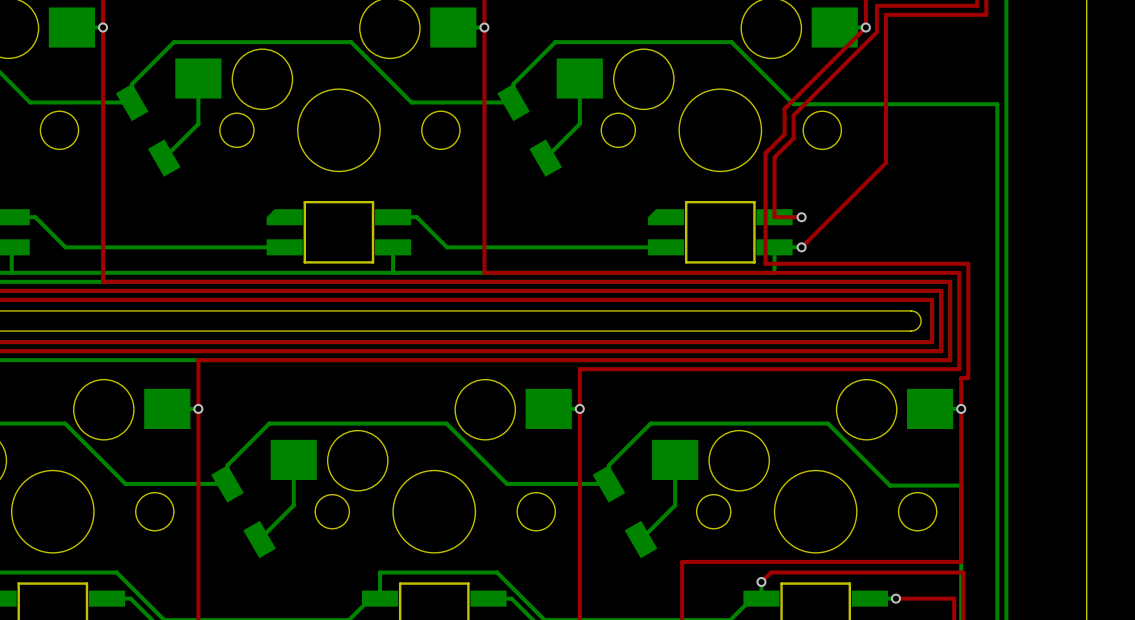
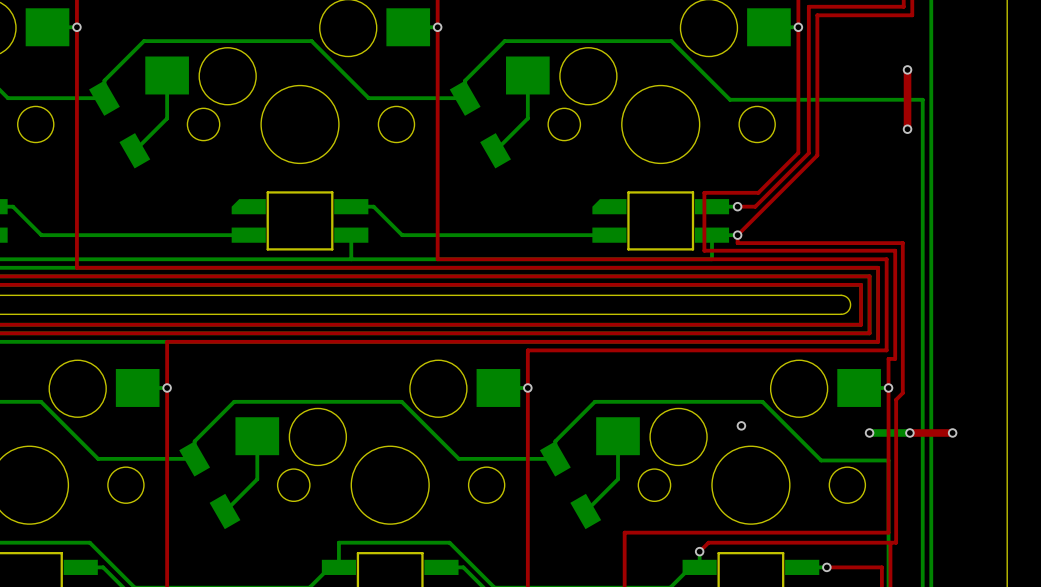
top track: (865, 27) (784, 108) (784, 134) (765, 153) (766, 263) -> (798, 27) (798, 152) (758, 192) (704, 192) (704, 250)
top track: (876, 32) (793, 115) (793, 138) (774, 157) (774, 217) (801, 217) -> (808, 31) (808, 153) (755, 206) (737, 206)
top track: none -> (907, 69) (907, 129)
via: none -> (907, 69)
via: none -> (907, 129)
top track: none -> (737, 235) (737, 243) (902, 243) (902, 393) (896, 399) (896, 542) (890, 542)
via: none -> (741, 425)
bottom track: none -> (869, 432) (909, 432)
via: none -> (869, 432)
top track: none -> (909, 432) (952, 432)
via: none -> (909, 432)
via: none -> (952, 432)

